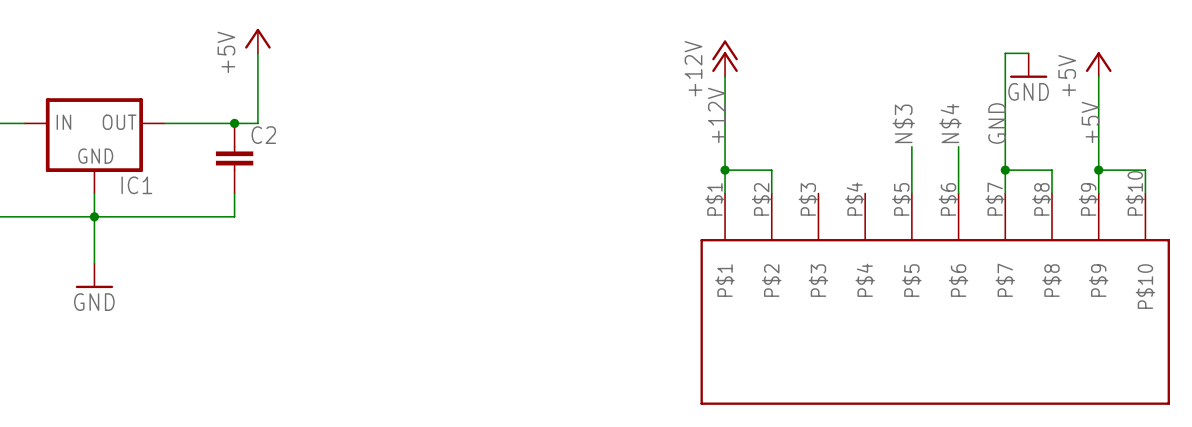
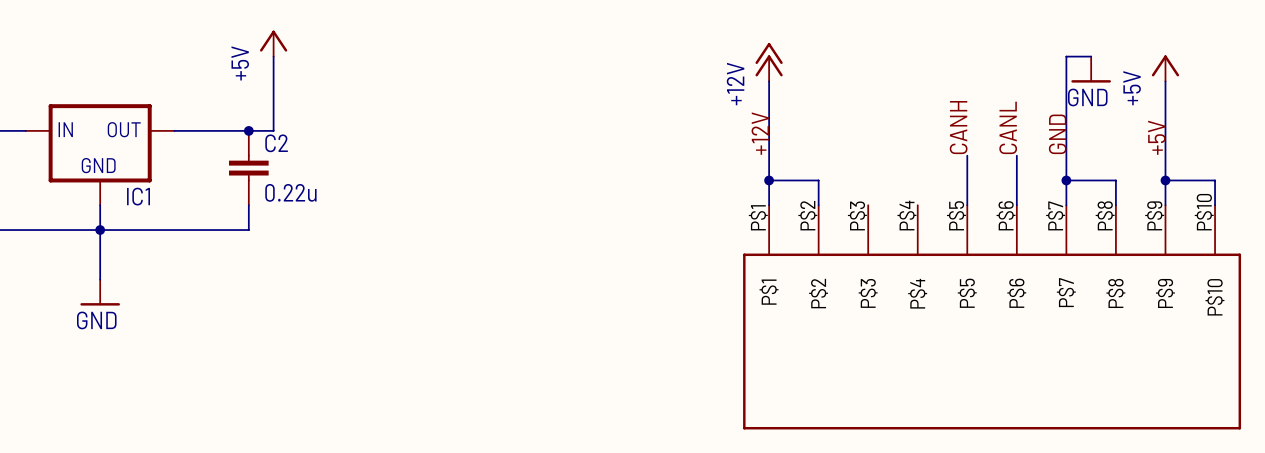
label: N$3 (903, 123) -> CANH (958, 127)
label: N$4 (950, 123) -> CANL (1008, 127)
C2 value: none -> 0.22u (290, 192)

